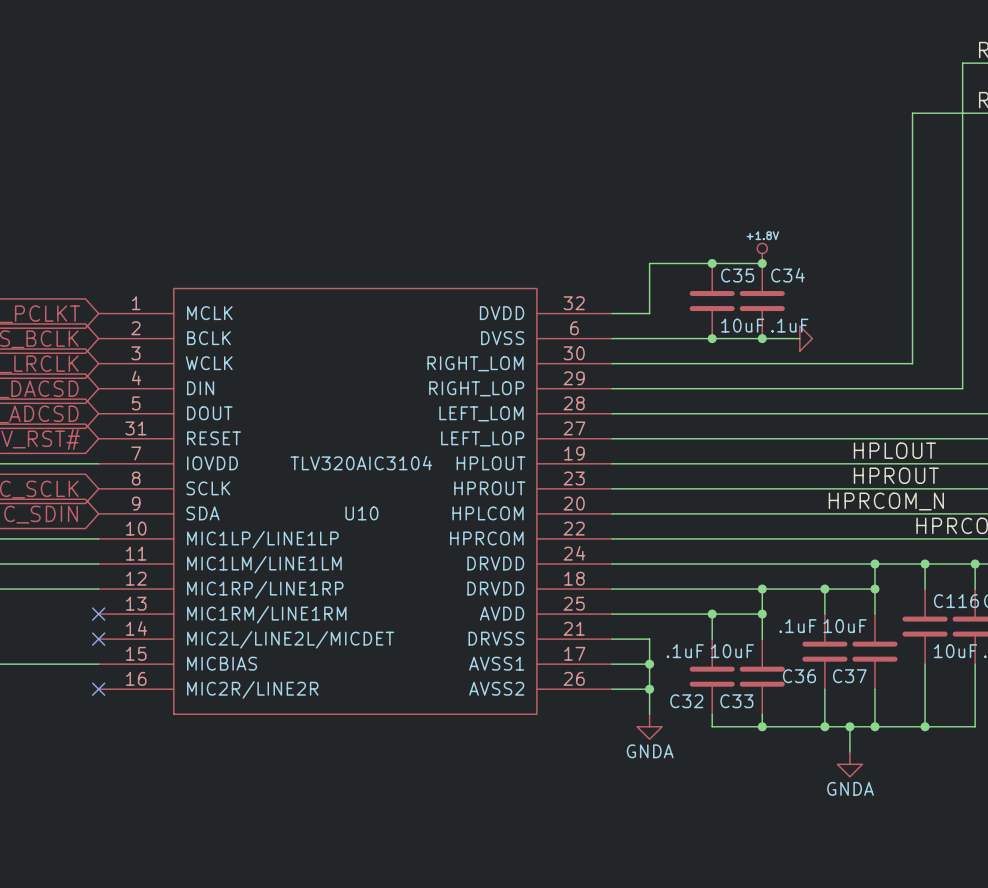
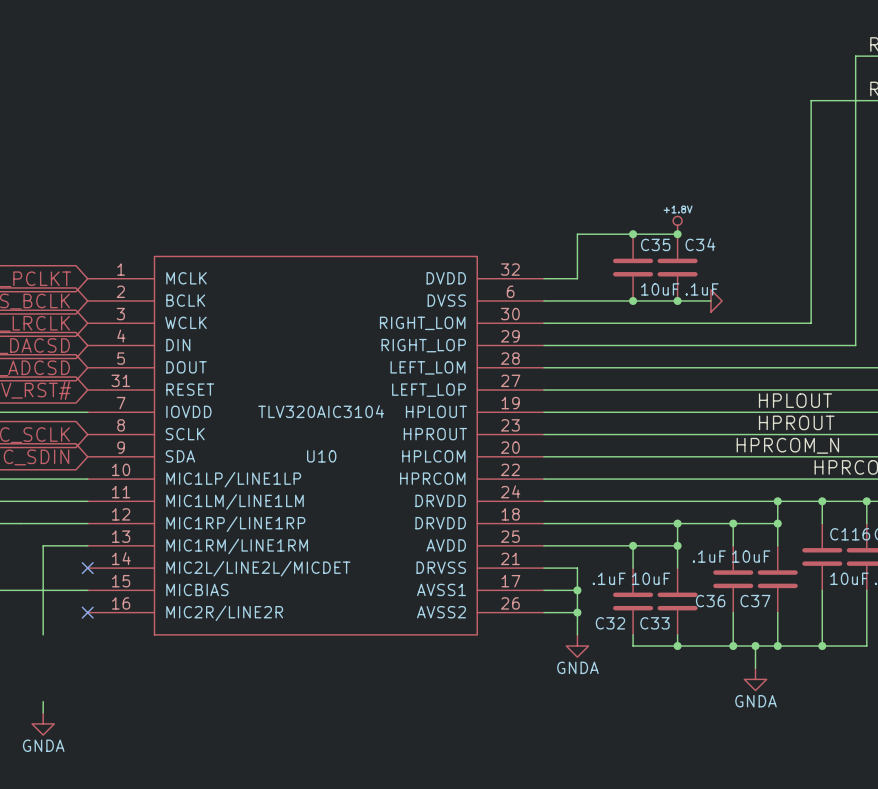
wire: none -> (87, 545) (43, 545) (43, 634)
no-connect mark: (98, 614) -> none
wire: none -> (43, 701) (43, 712)
power symbol: none -> GNDA (43, 723)

